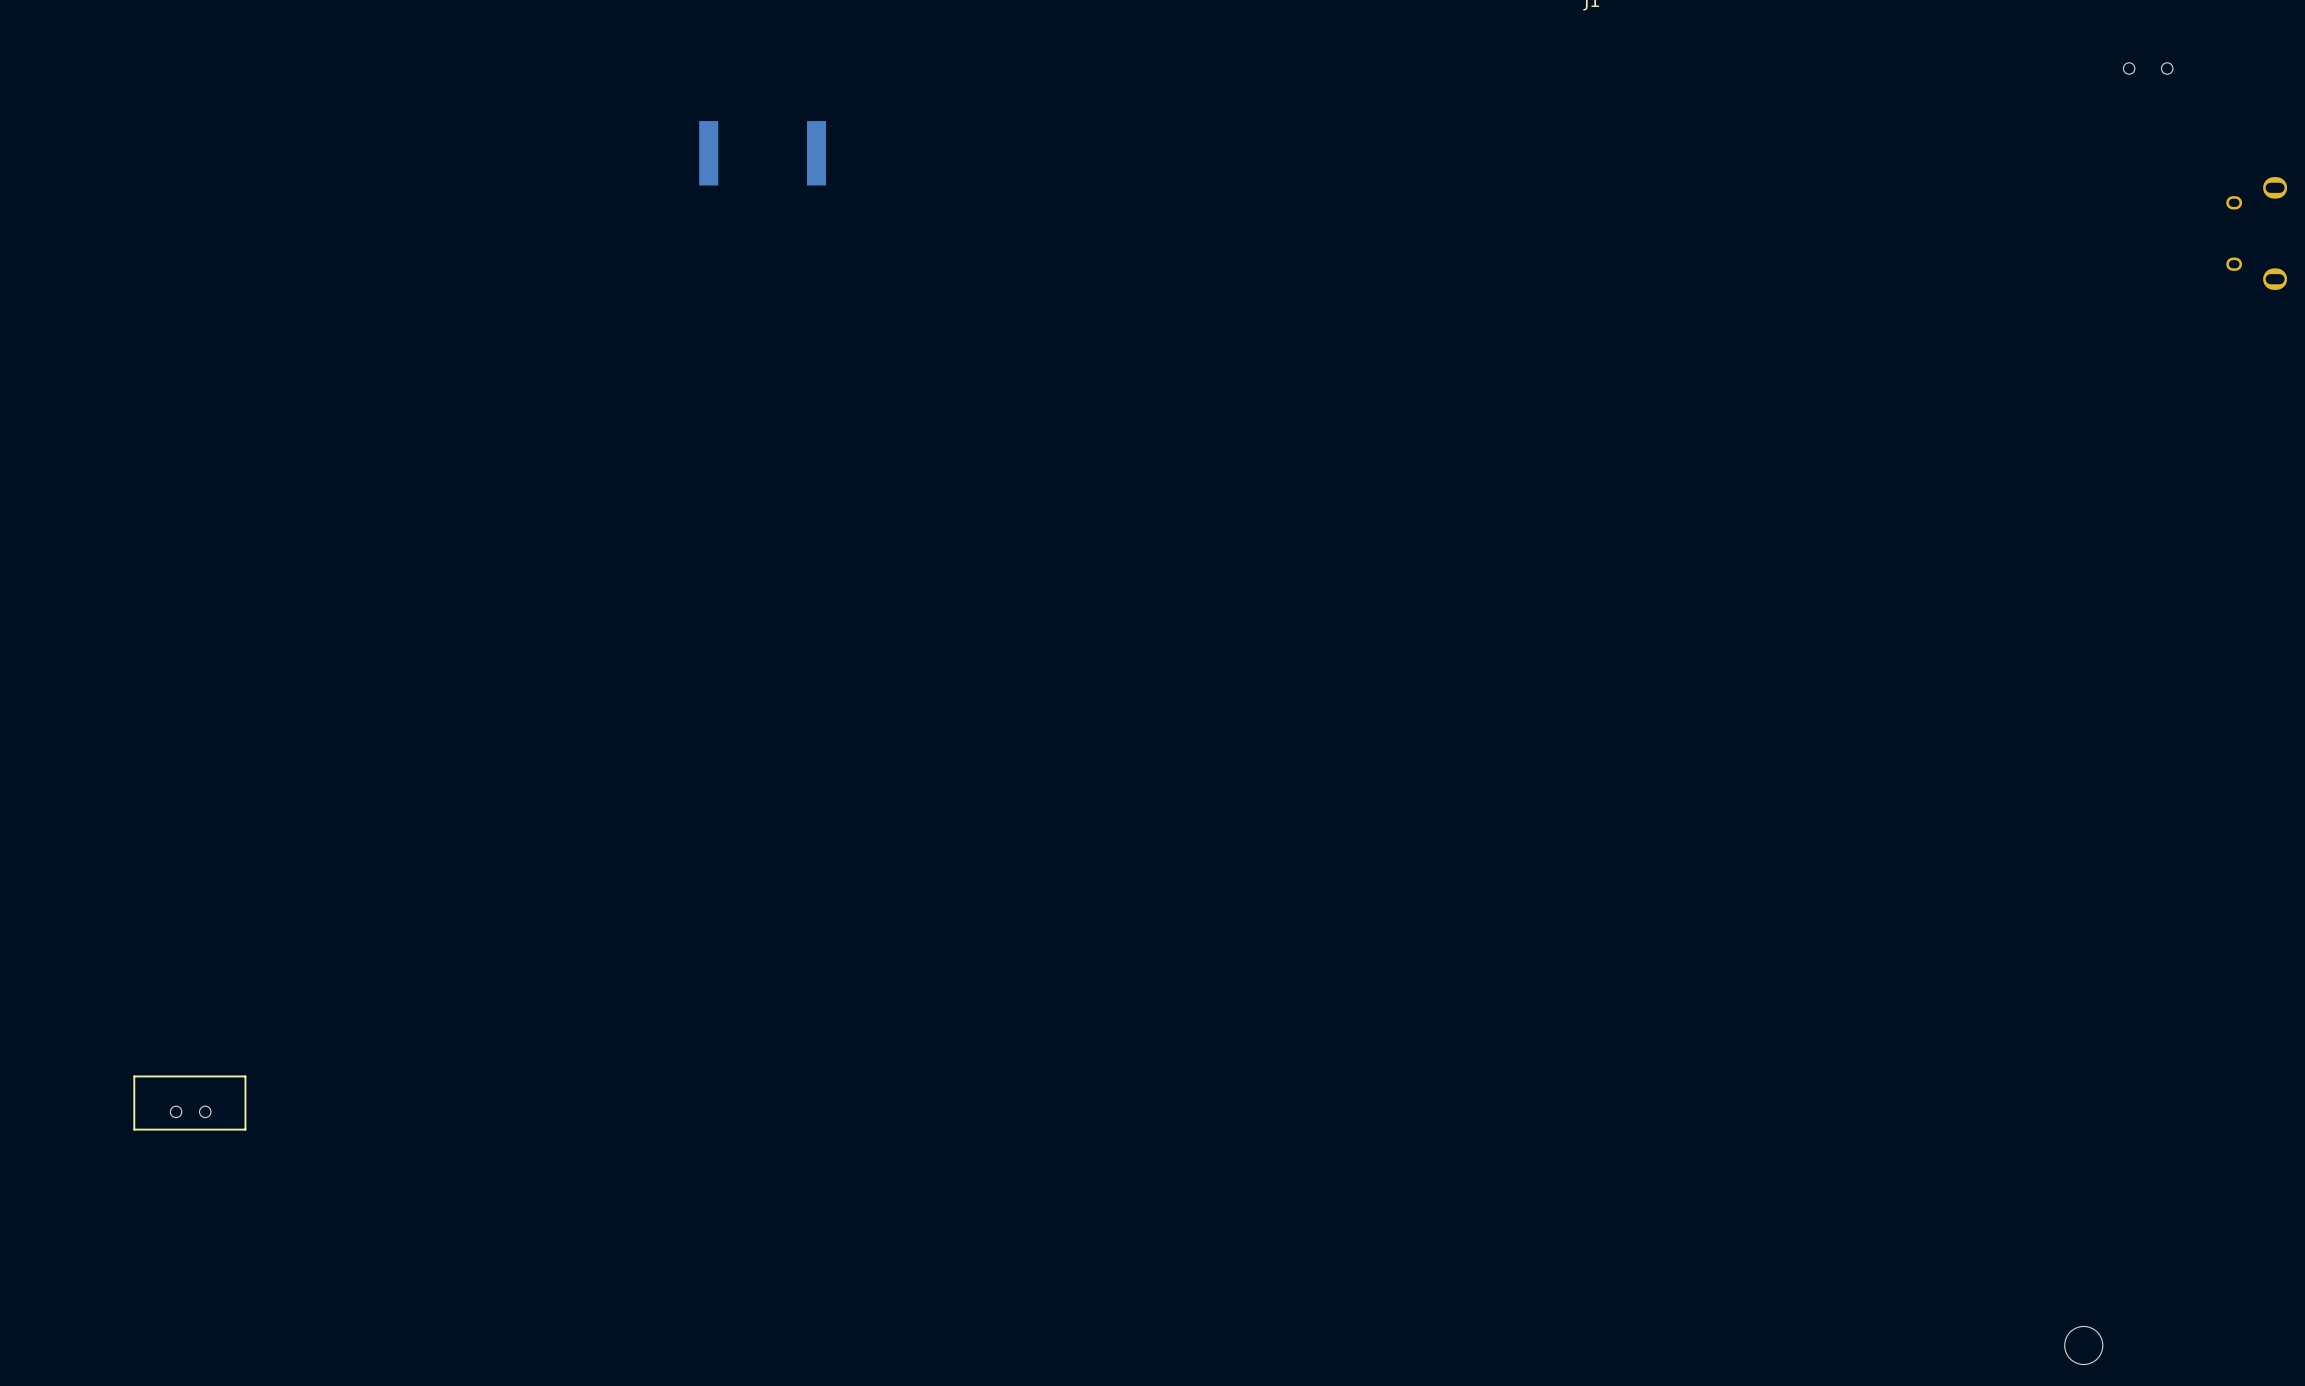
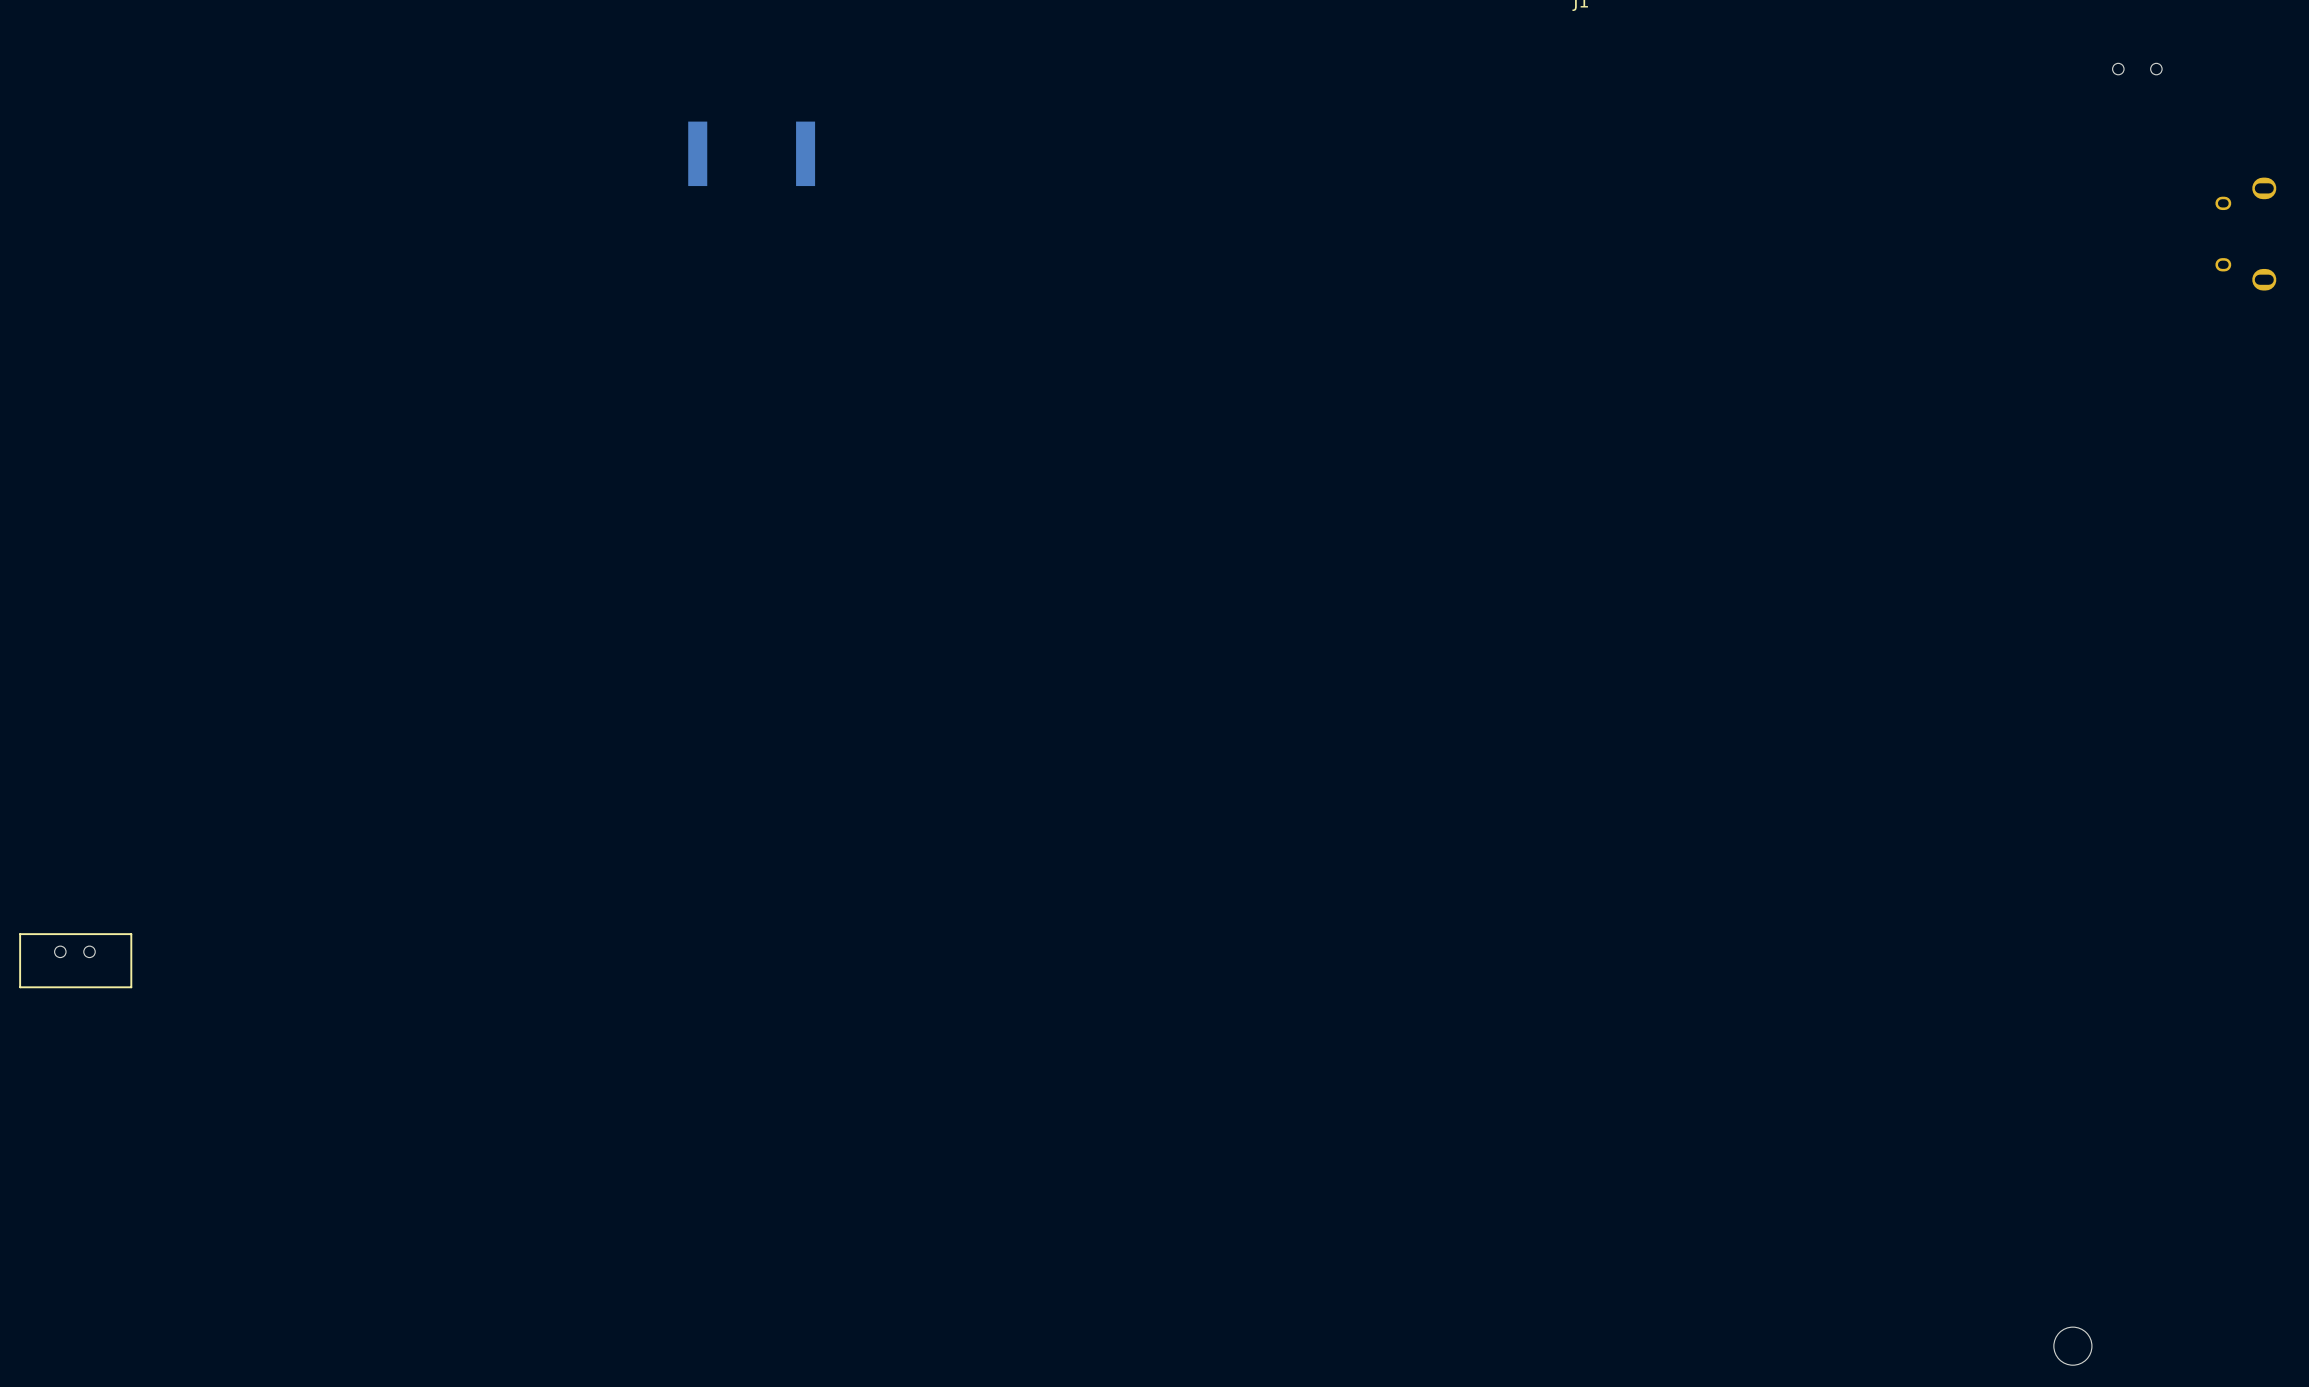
part rotation: 0° (189, 1103) -> 180° (75, 960)
part position: (189, 1103) -> (75, 960)

